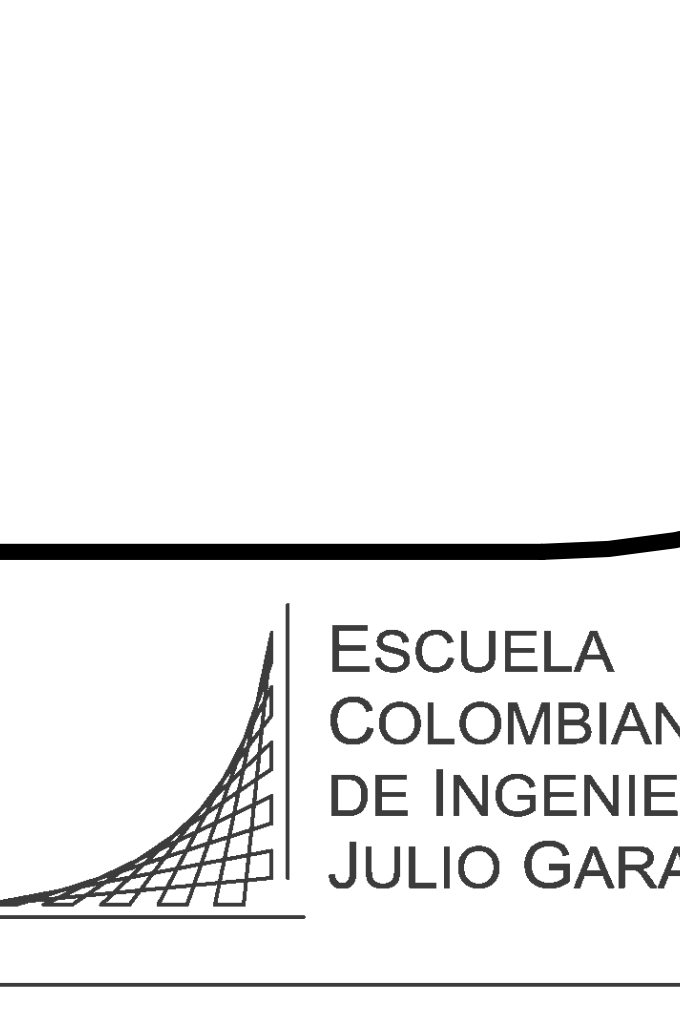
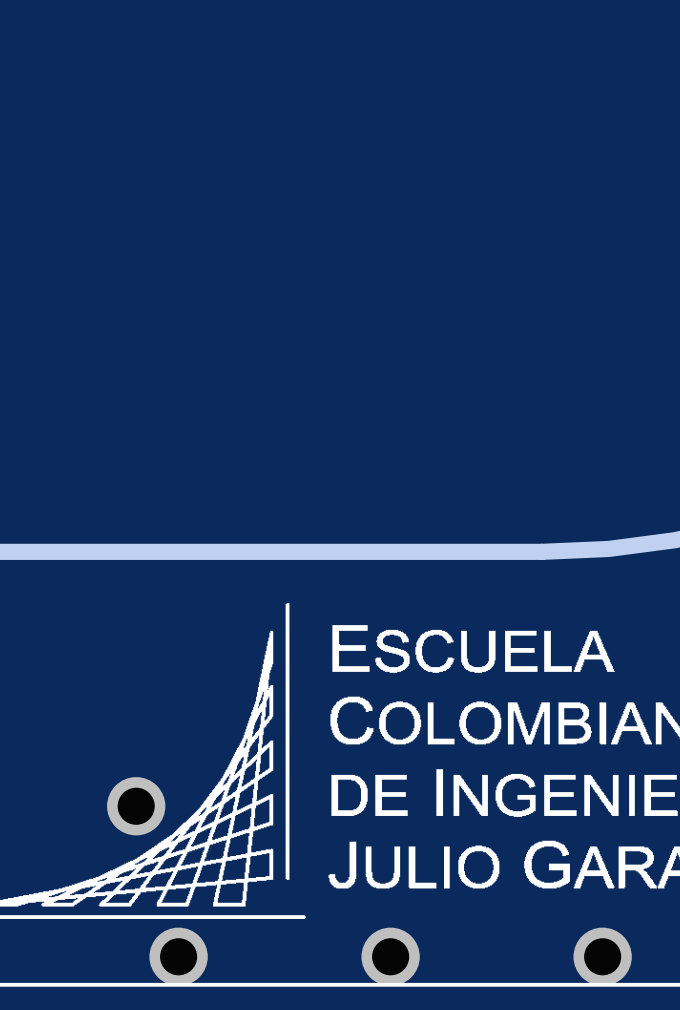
via: none -> (136, 806)
via: none -> (178, 956)
via: none -> (390, 956)
via: none -> (602, 956)

